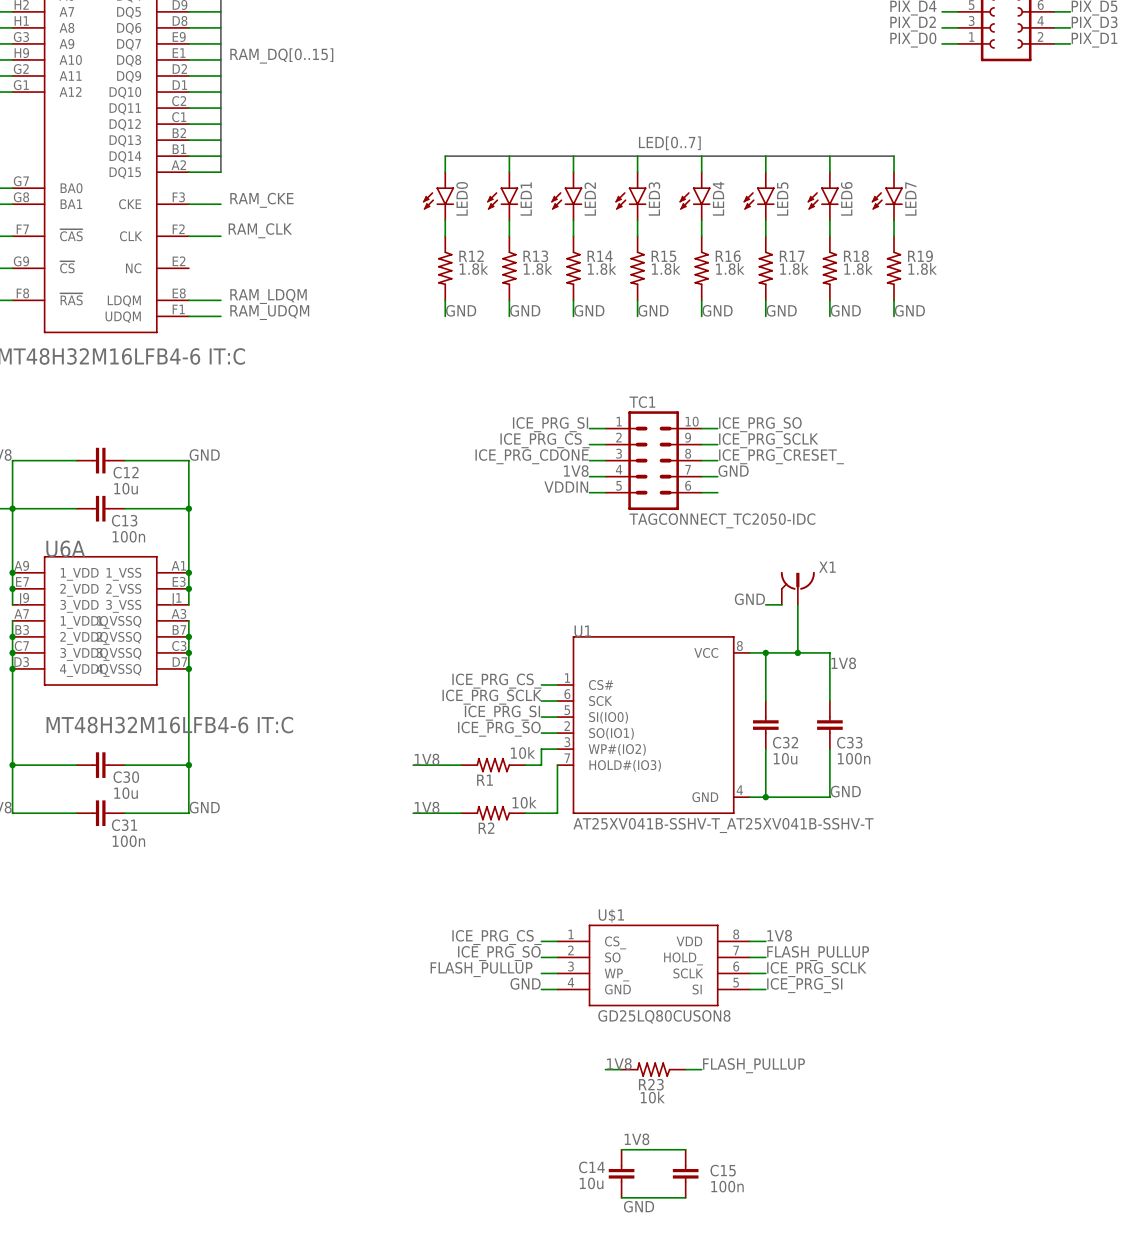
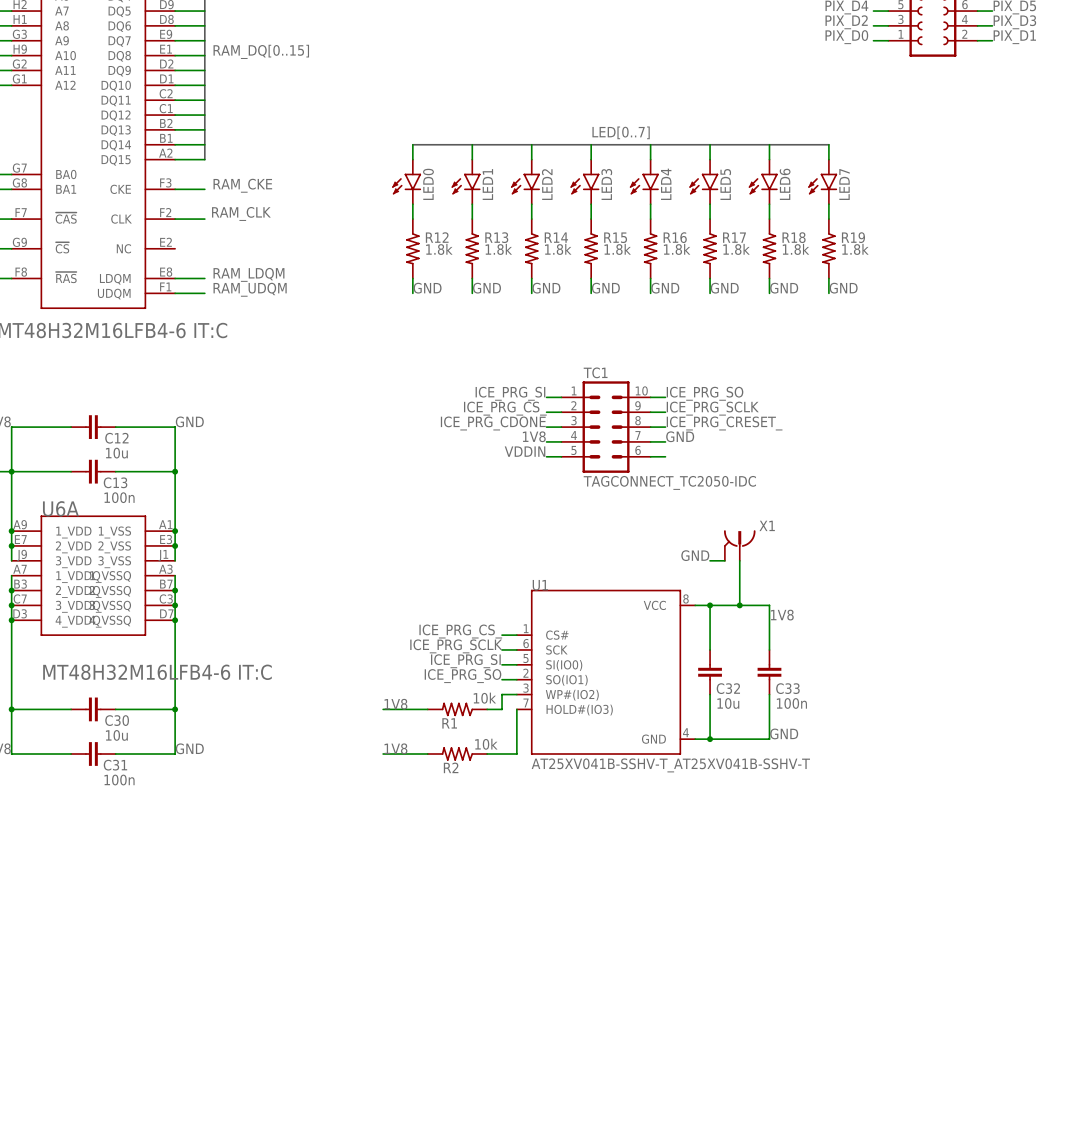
label: 1V8 (779, 935) -> none
label: ICE_PRG_CS_ (496, 937) -> none
wire: (541, 941) (557, 941) -> none
wire: (749, 941) (765, 941) -> none
label: ICE_PRG_SO (499, 953) -> none
label: FLASH_PULLUP (818, 953) -> none
wire: (541, 957) (557, 957) -> none
wire: (749, 957) (765, 957) -> none
U$1: GD25LQ80CUSON8 (653, 965) -> none
label: FLASH_PULLUP (481, 969) -> none
label: ICE_PRG_SCLK (816, 969) -> none
wire: (541, 973) (557, 973) -> none
wire: (749, 973) (765, 973) -> none
label: GND (525, 983) -> none
label: ICE_PRG_SI (804, 985) -> none
wire: (541, 989) (557, 989) -> none
wire: (749, 989) (765, 989) -> none
label: 1V8 (619, 1064) -> none
label: FLASH_PULLUP (753, 1065) -> none
wire: (605, 1069) (621, 1069) -> none
R23: 10k (653, 1069) -> none
wire: (685, 1069) (701, 1069) -> none
label: 1V8 (637, 1139) -> none
wire: (621, 1149) (685, 1149) -> none
C14: 10u (621, 1173) -> none
C15: 100n (685, 1173) -> none
wire: (621, 1197) (685, 1197) -> none
label: GND (639, 1206) -> none

